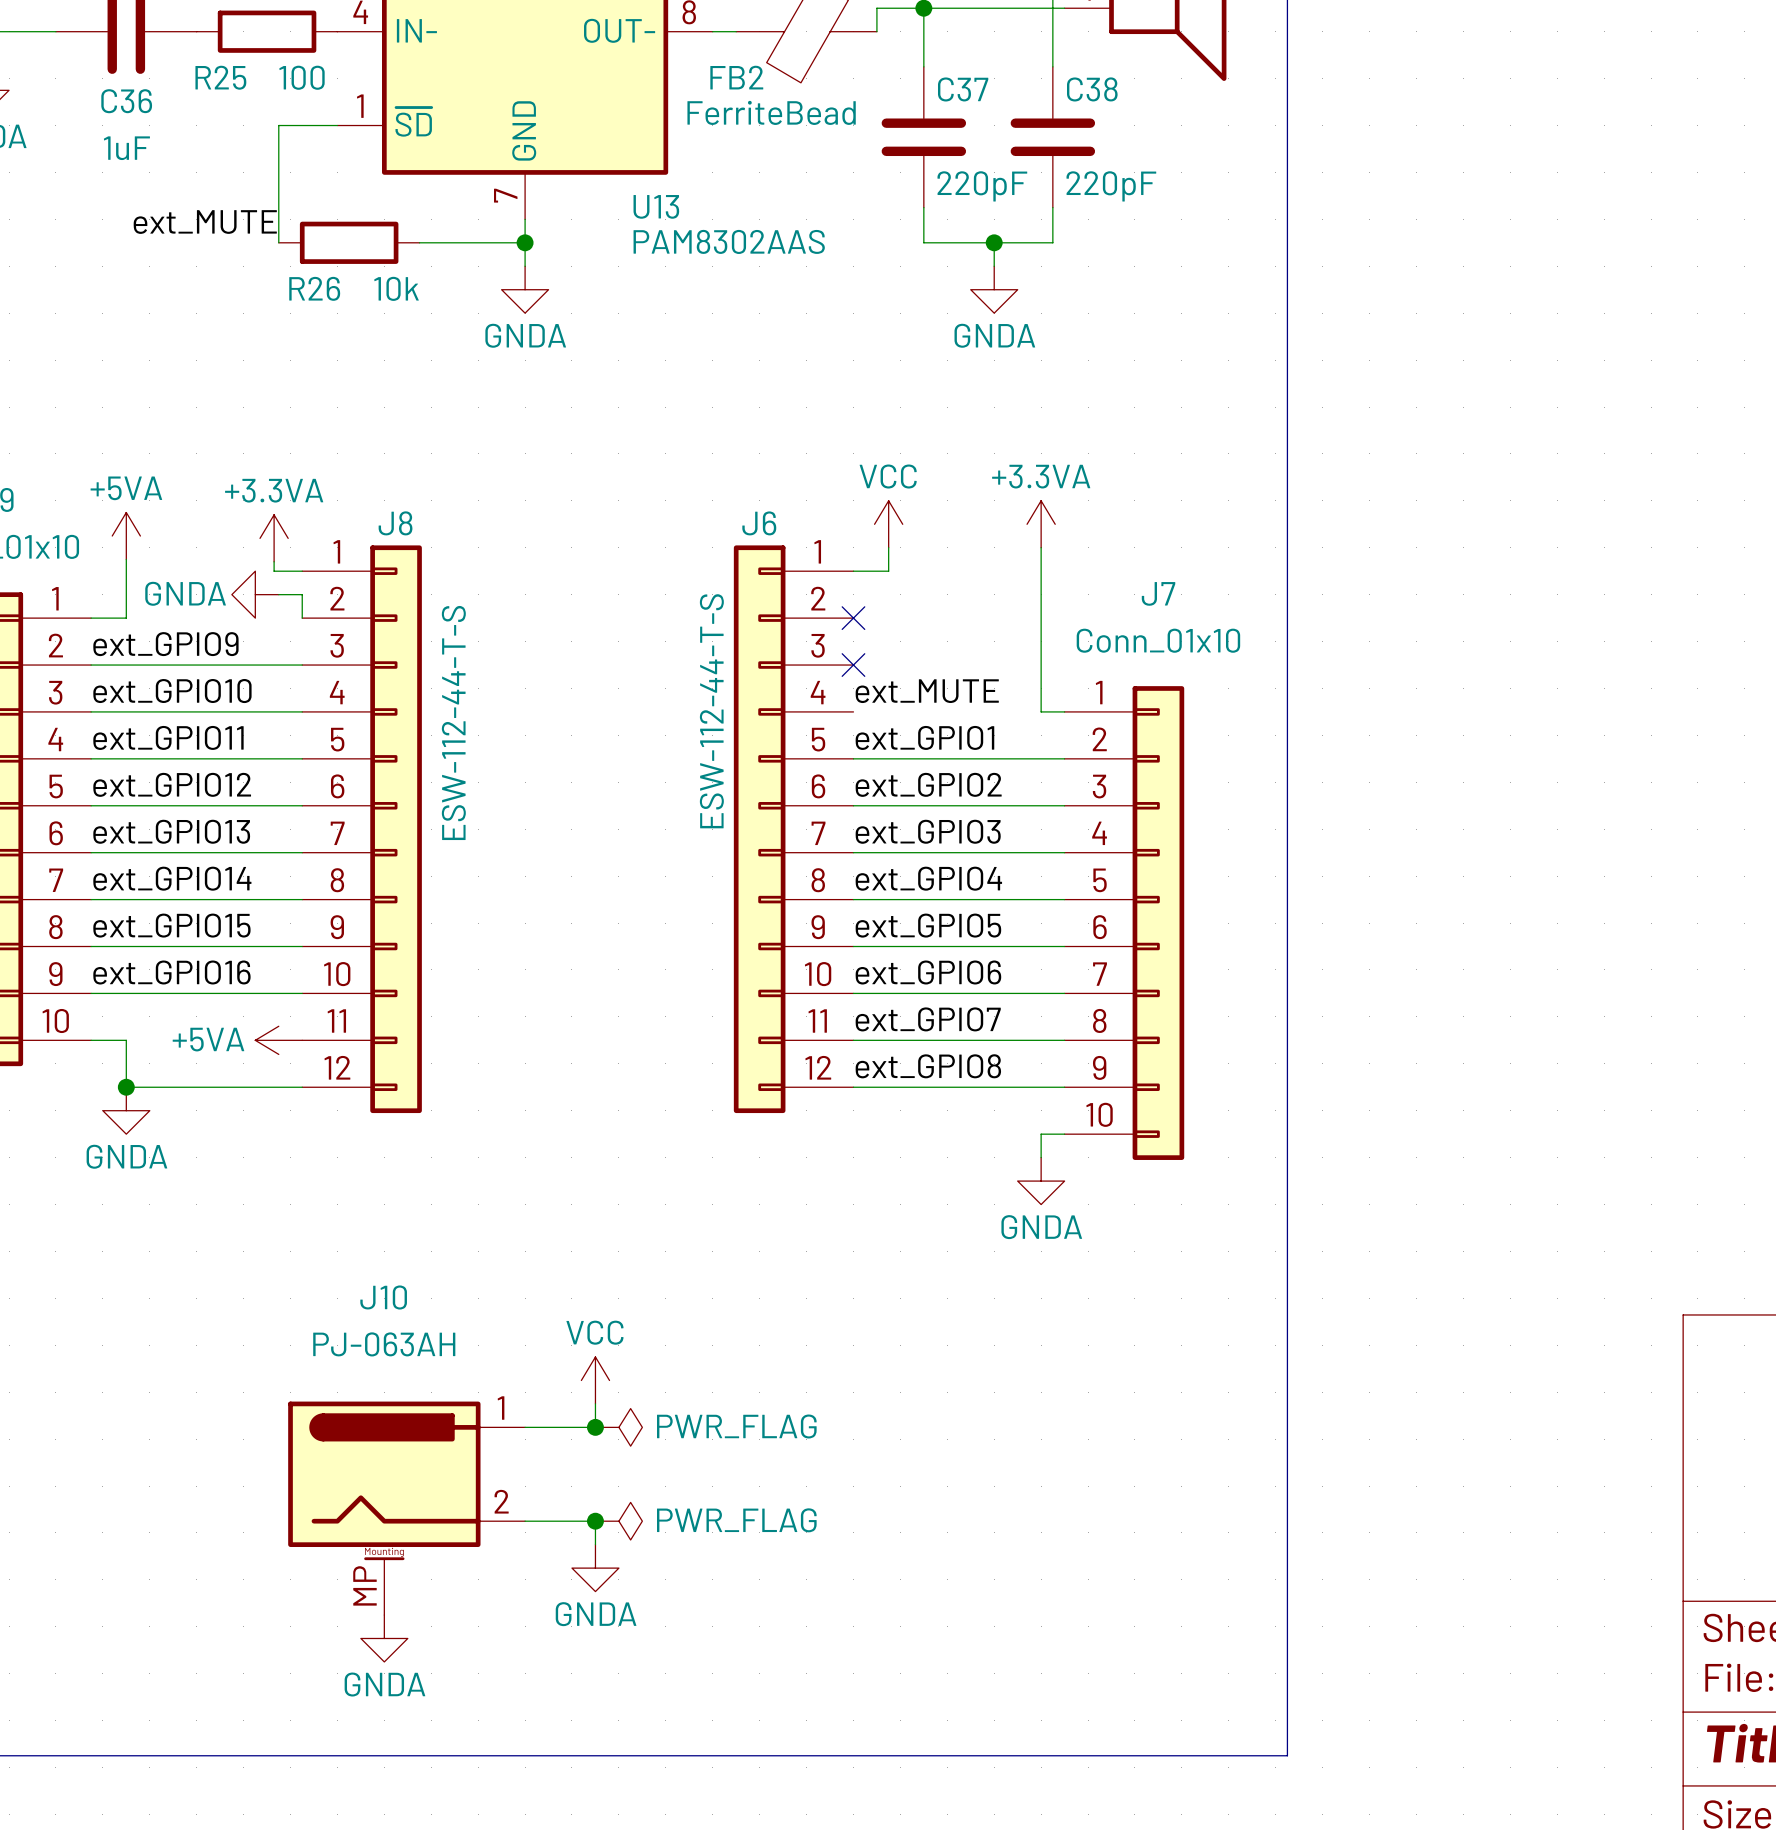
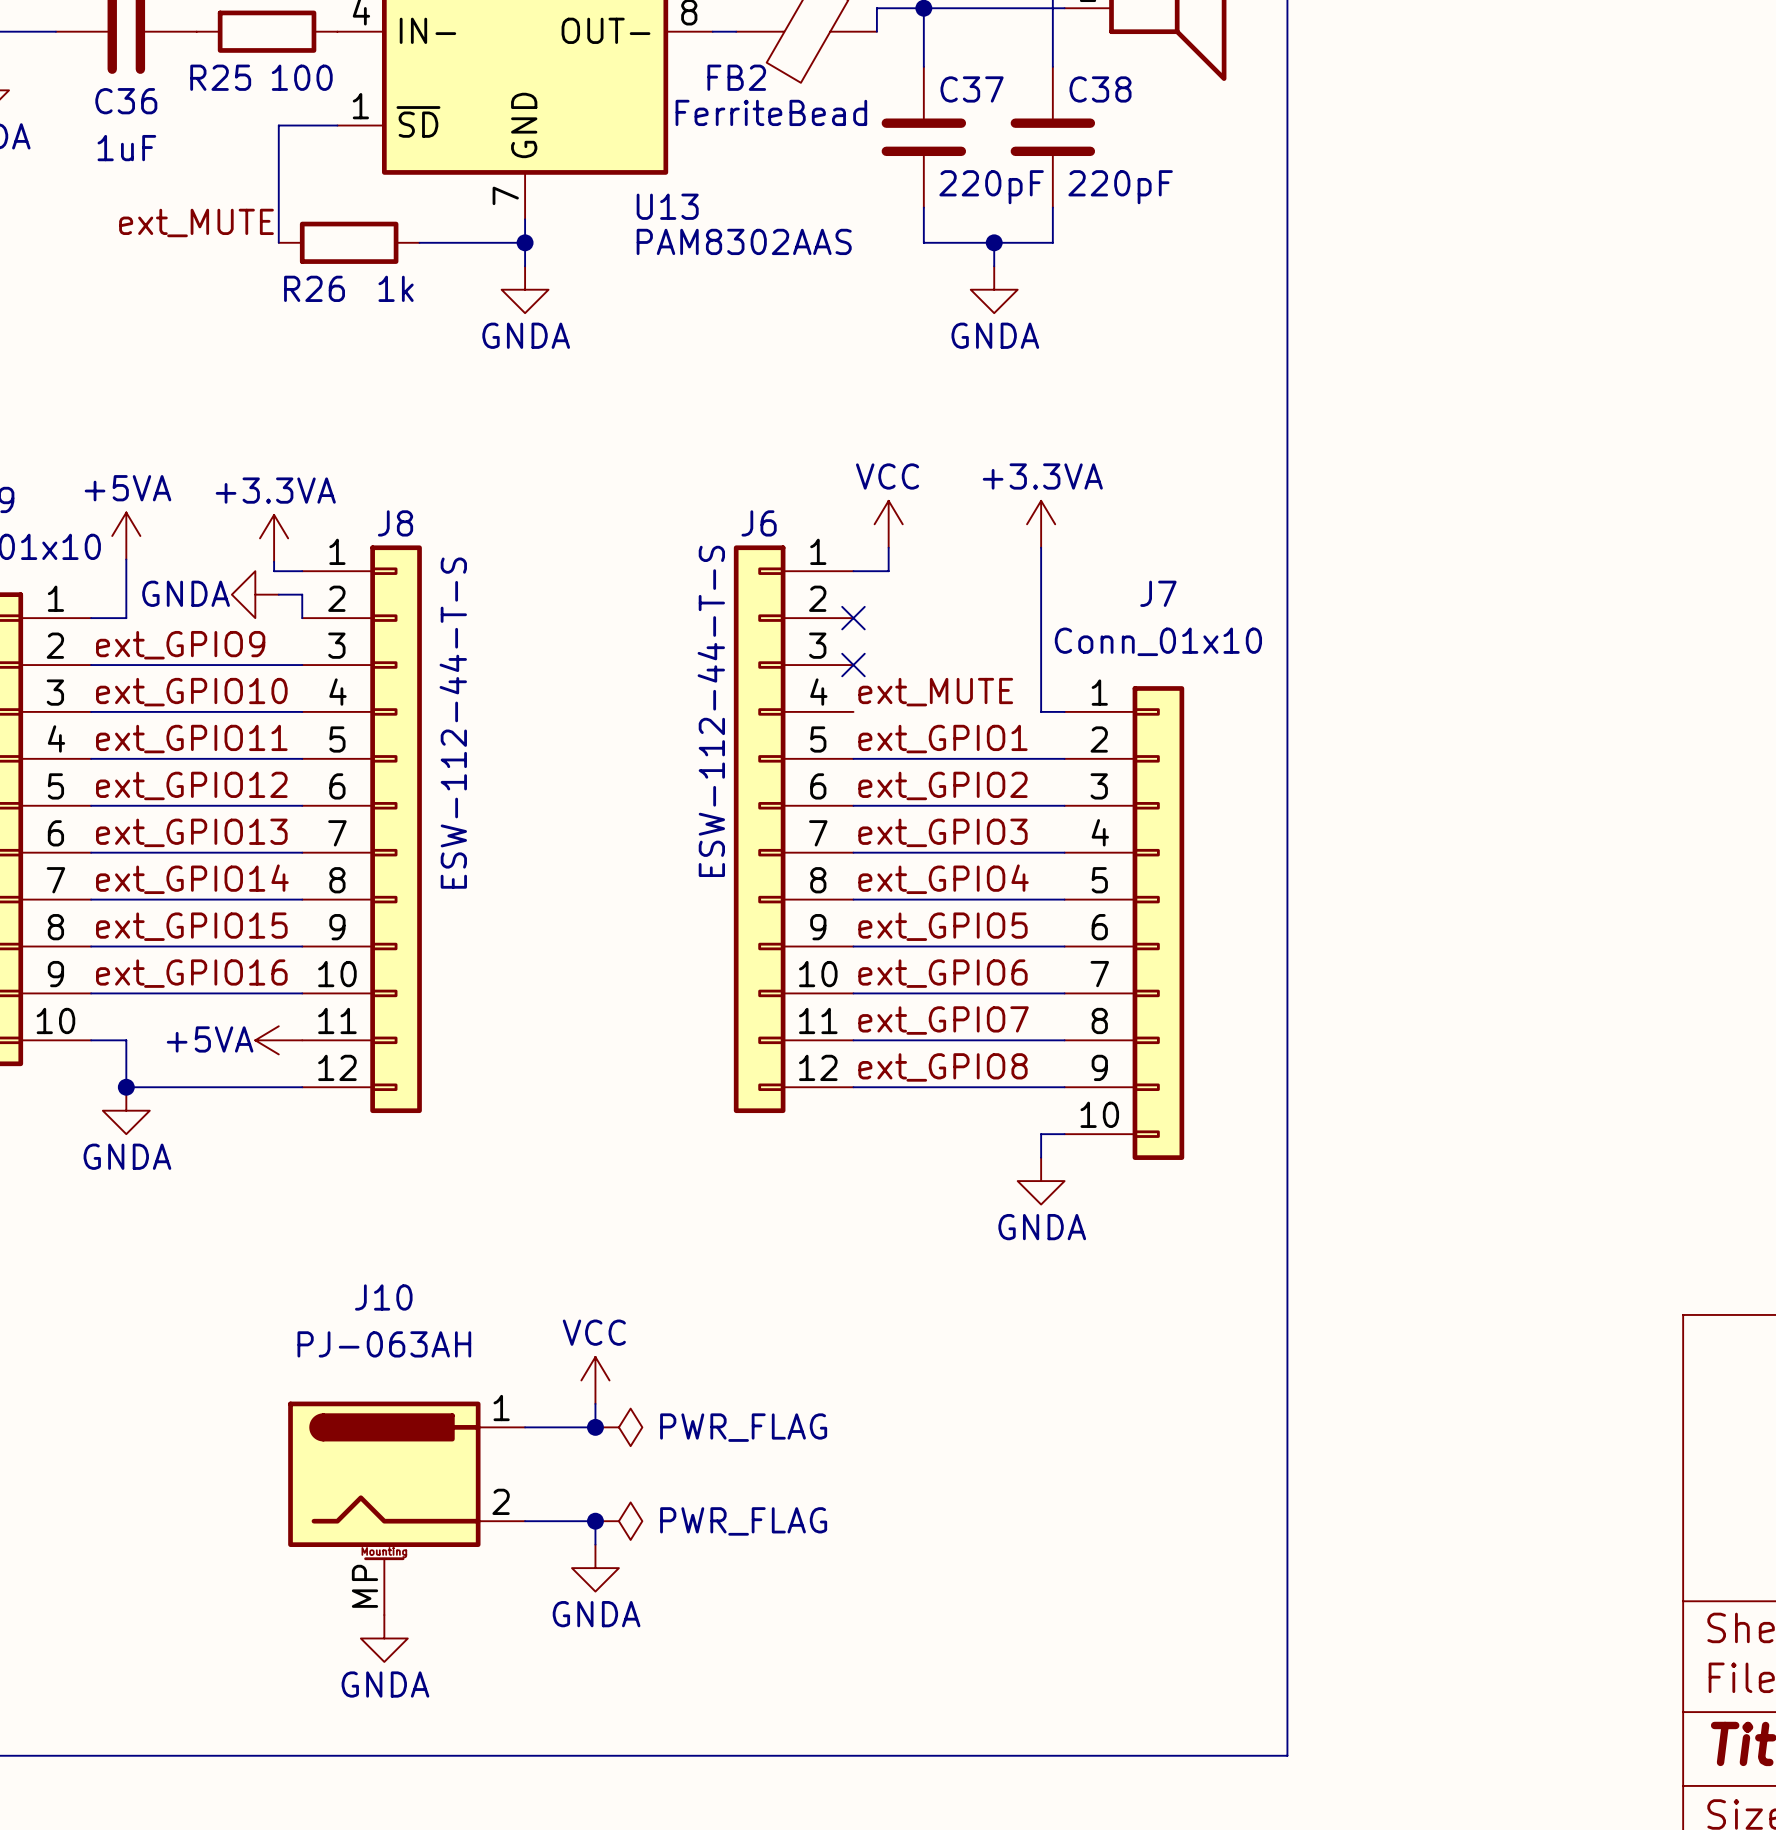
R26 value: 10k (396, 288) -> 1k (396, 288)

